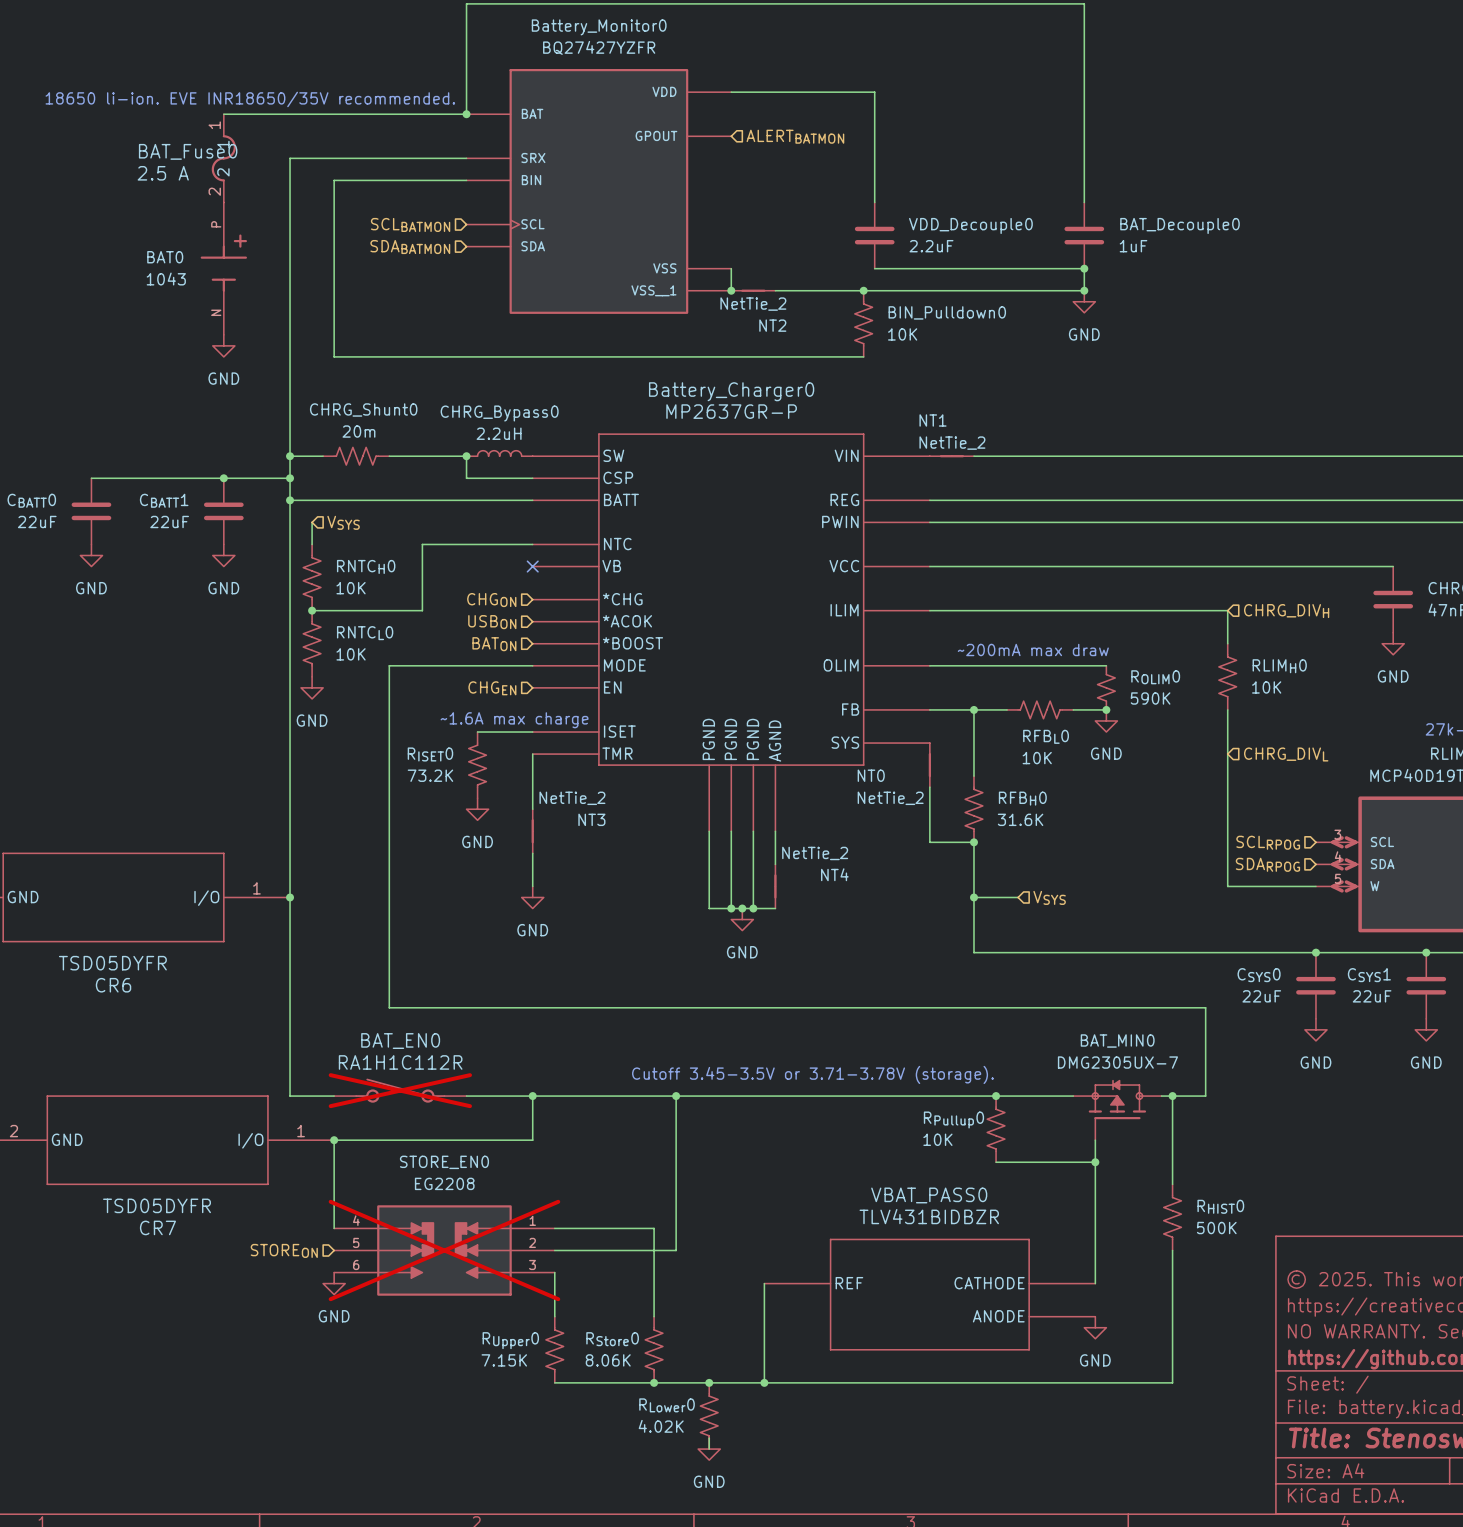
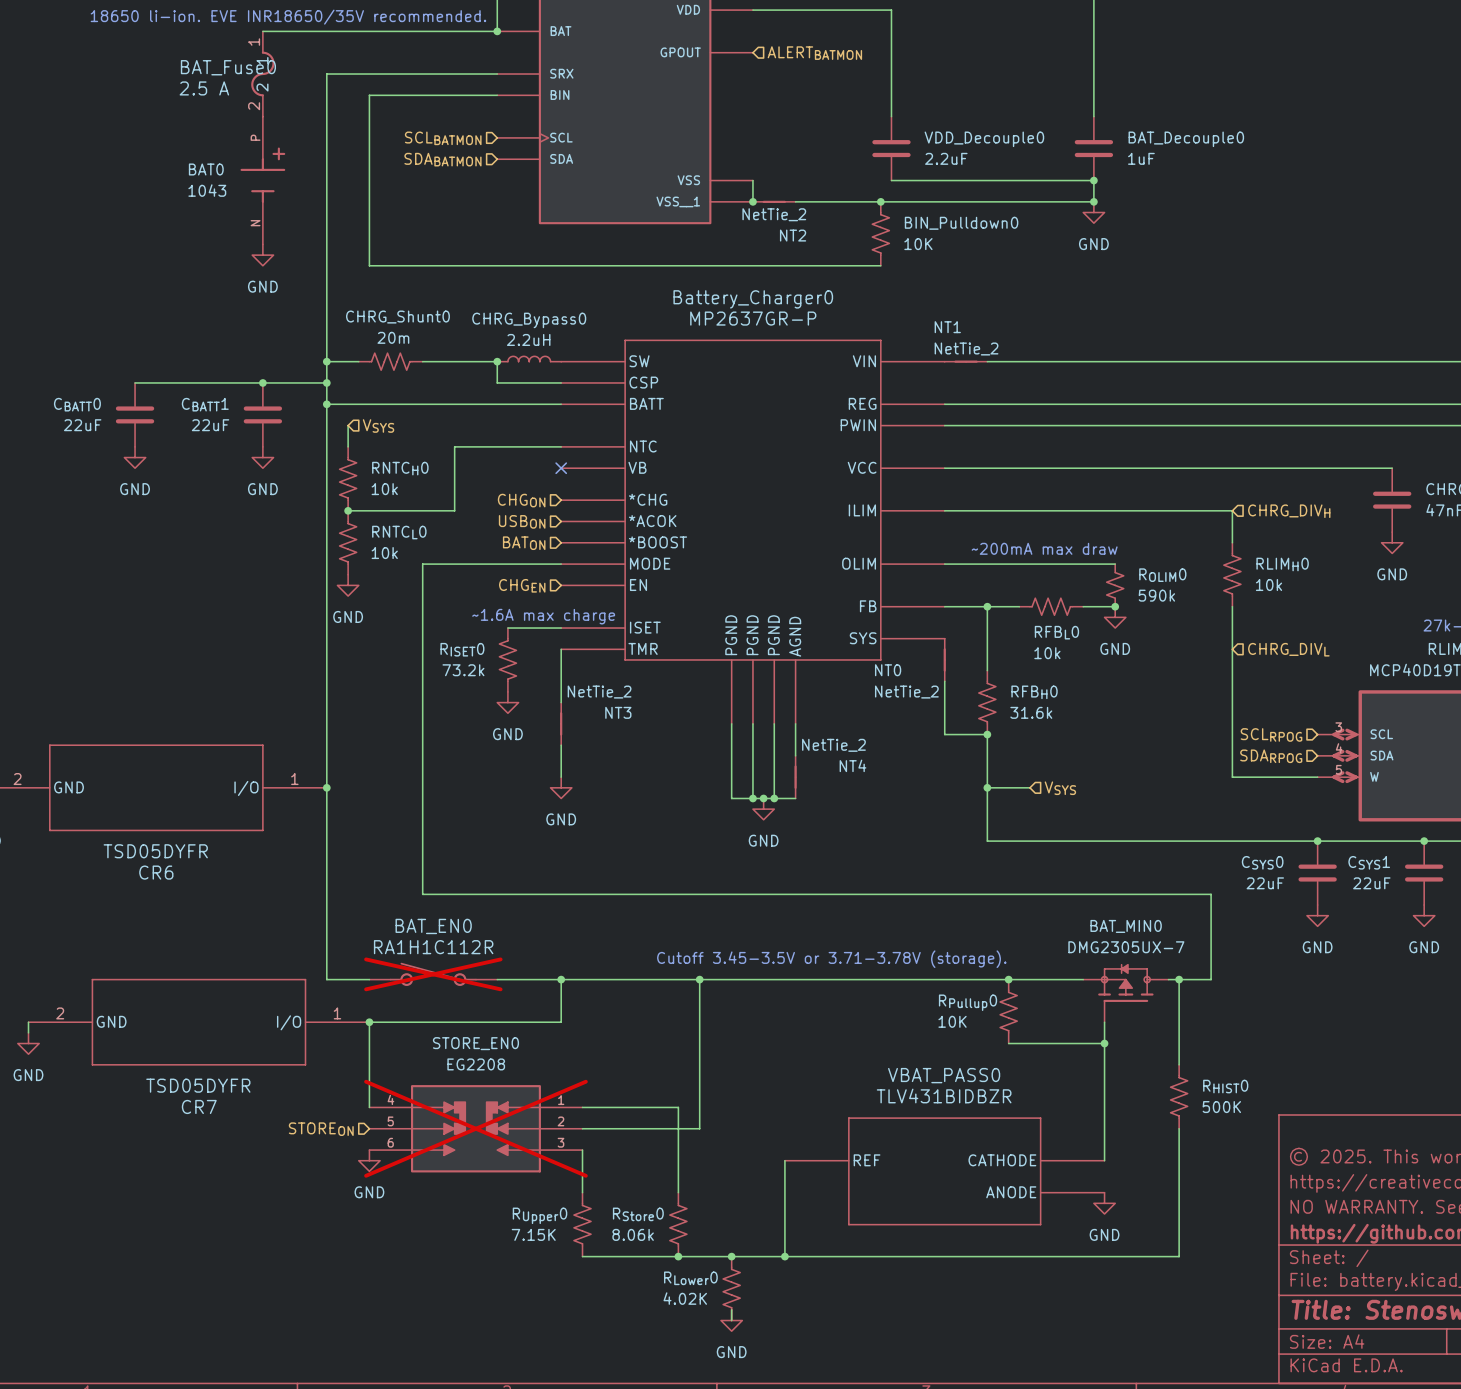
RNTCH0 value: 10K (351, 588) -> 10k (384, 489)
RNTCL0 value: 10K (351, 654) -> 10k (384, 553)
RLIMH0 value: 10K (1266, 687) -> 10k (1269, 585)
ROLIM0 value: 590K (1150, 698) -> 590k (1156, 595)
RFBL0 value: 10K (1037, 758) -> 10k (1047, 653)
RISET0 value: 73.2K (430, 775) -> 73.2k (463, 670)
RFBH0 value: 31.6K (1020, 819) -> 31.6k (1031, 712)
RStore0 value: 8.06K (608, 1360) -> 8.06k (633, 1234)

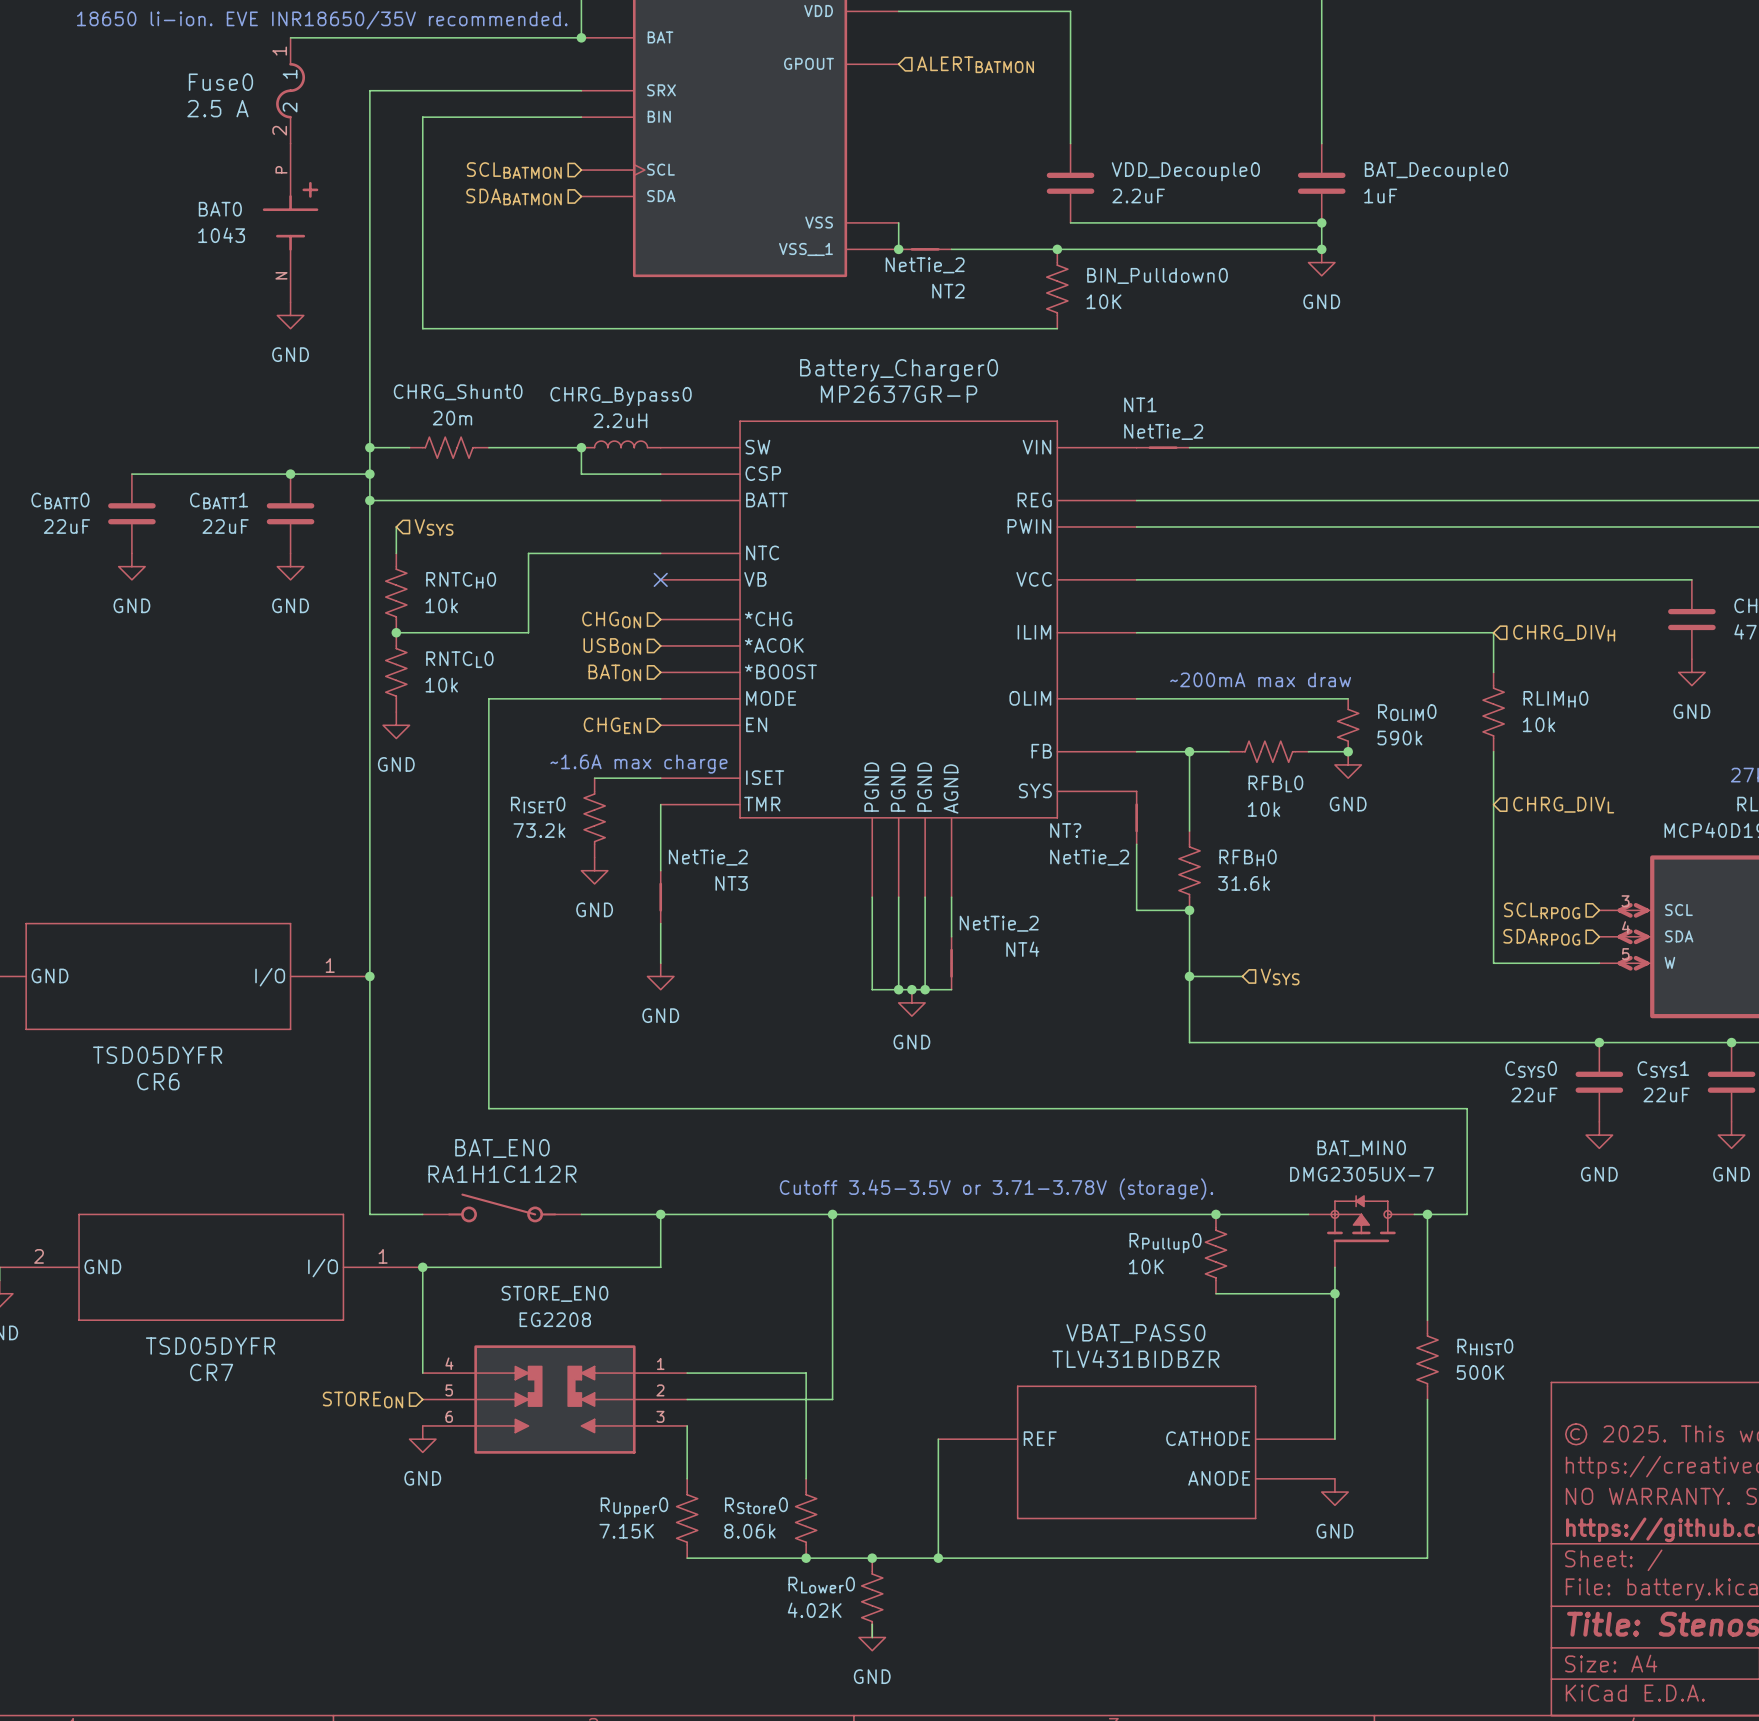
BAT_Fuse0 name: BAT_Fuse0 (228, 67) -> Fuse0 (220, 82)
NT0 name: NT0 (888, 670) -> NT? (1065, 830)
BAT_EN0 do-not-place cross: (433, 974) -> none
STORE_EN0 do-not-place cross: (475, 1128) -> none

